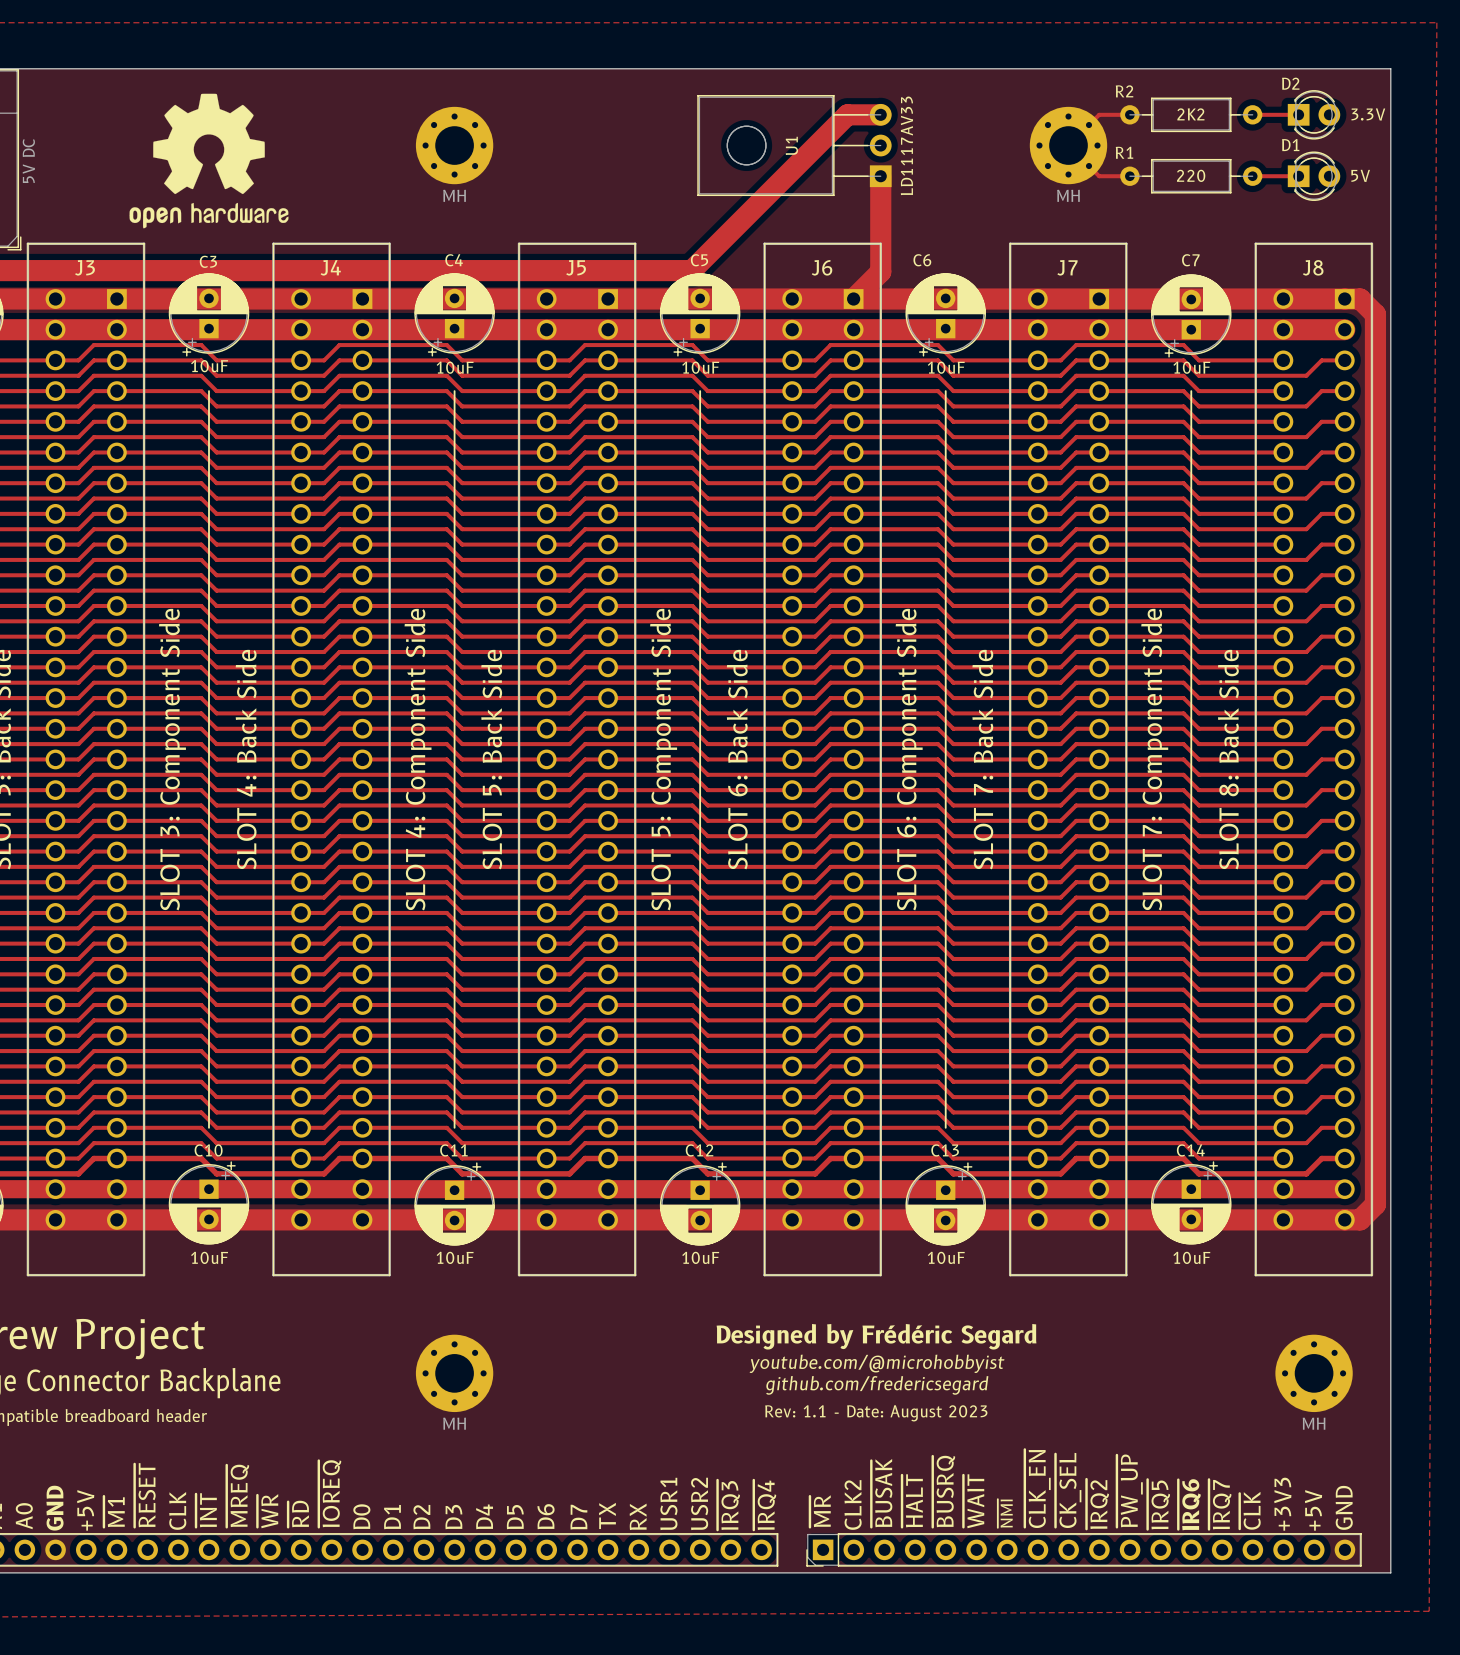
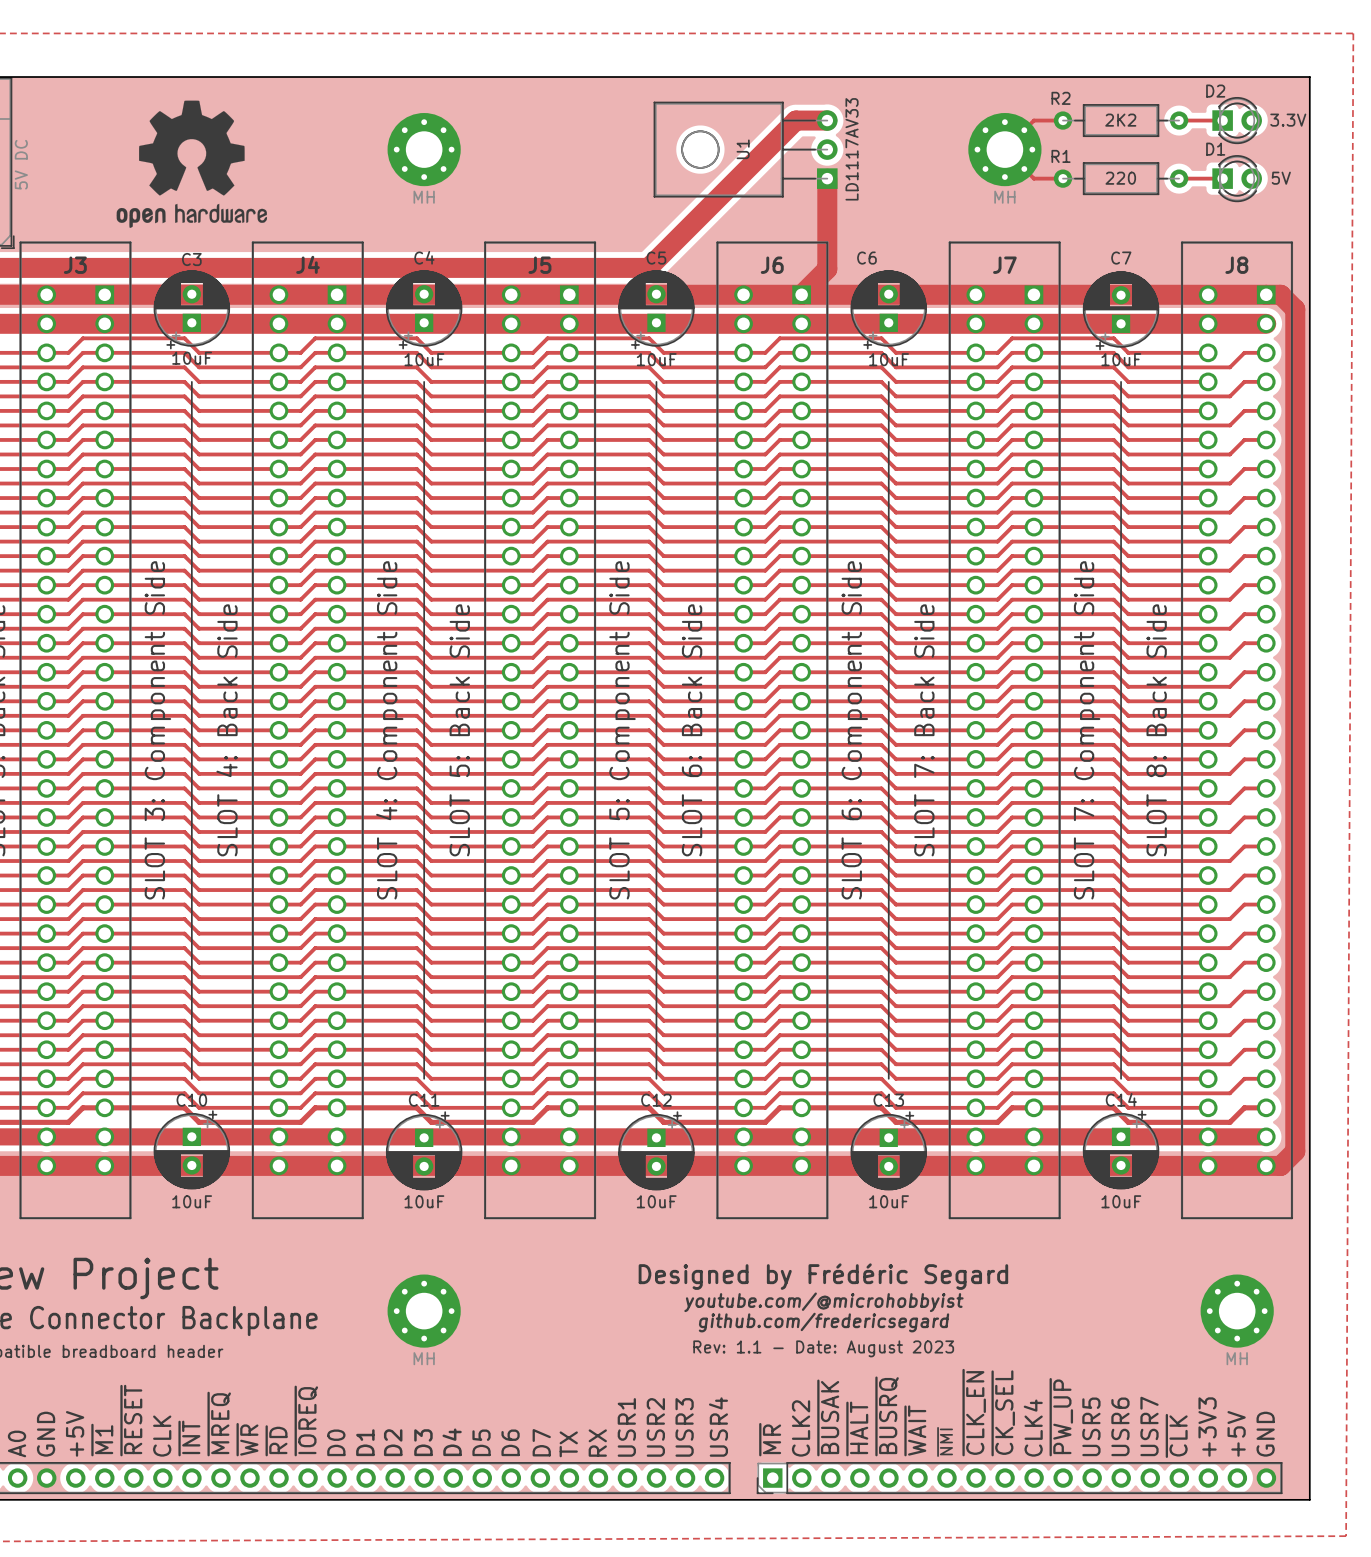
text: ~{IRQ2} (1097, 1504) -> CLK4 (1033, 1428)
text: ~{IRQ5} (1158, 1504) -> USR5 (1091, 1426)
text: ~{IRQ6} (1189, 1504) -> USR6 (1120, 1426)
text: ~{IRQ7} (1220, 1504) -> USR7 (1149, 1426)
text: ~{IRQ3} (728, 1505) -> USR3 (684, 1427)
text: ~{IRQ4} (764, 1505) -> USR4 (718, 1427)

